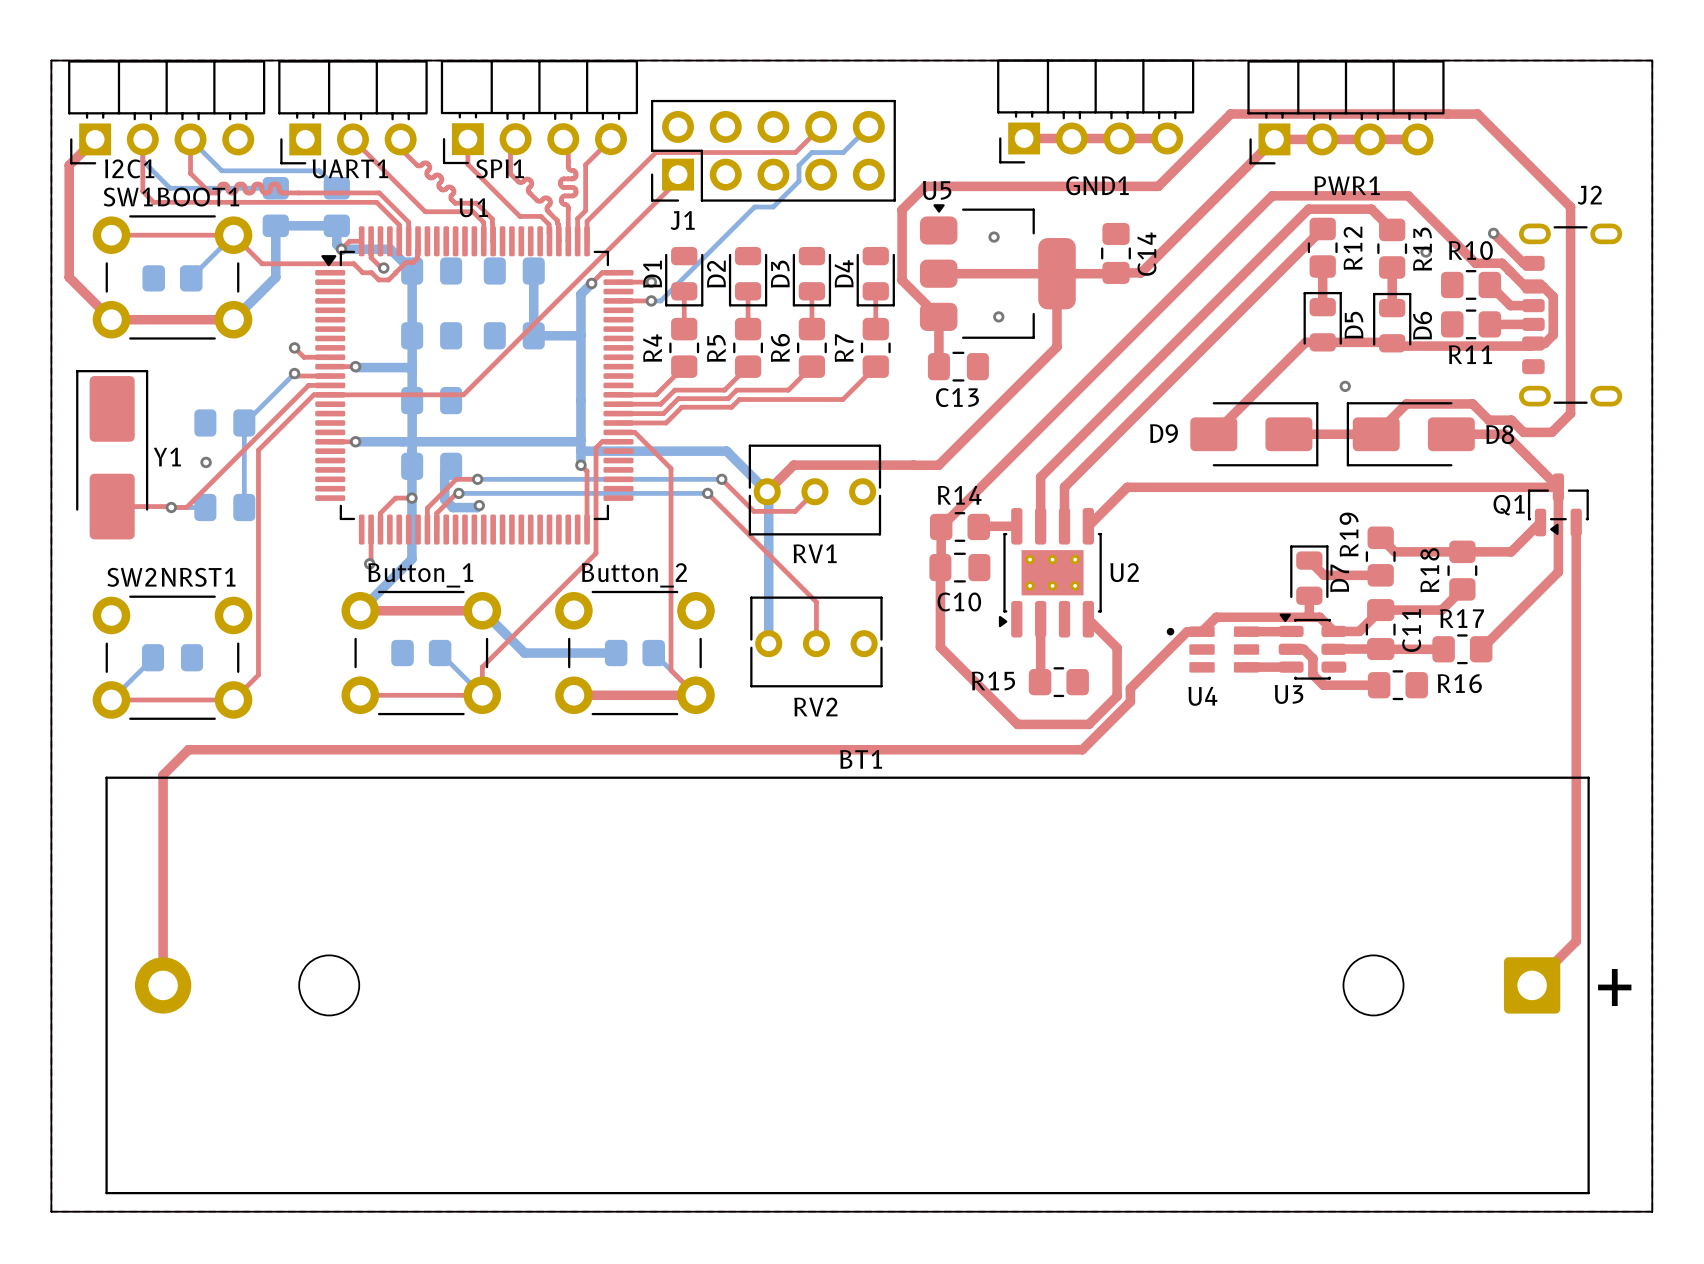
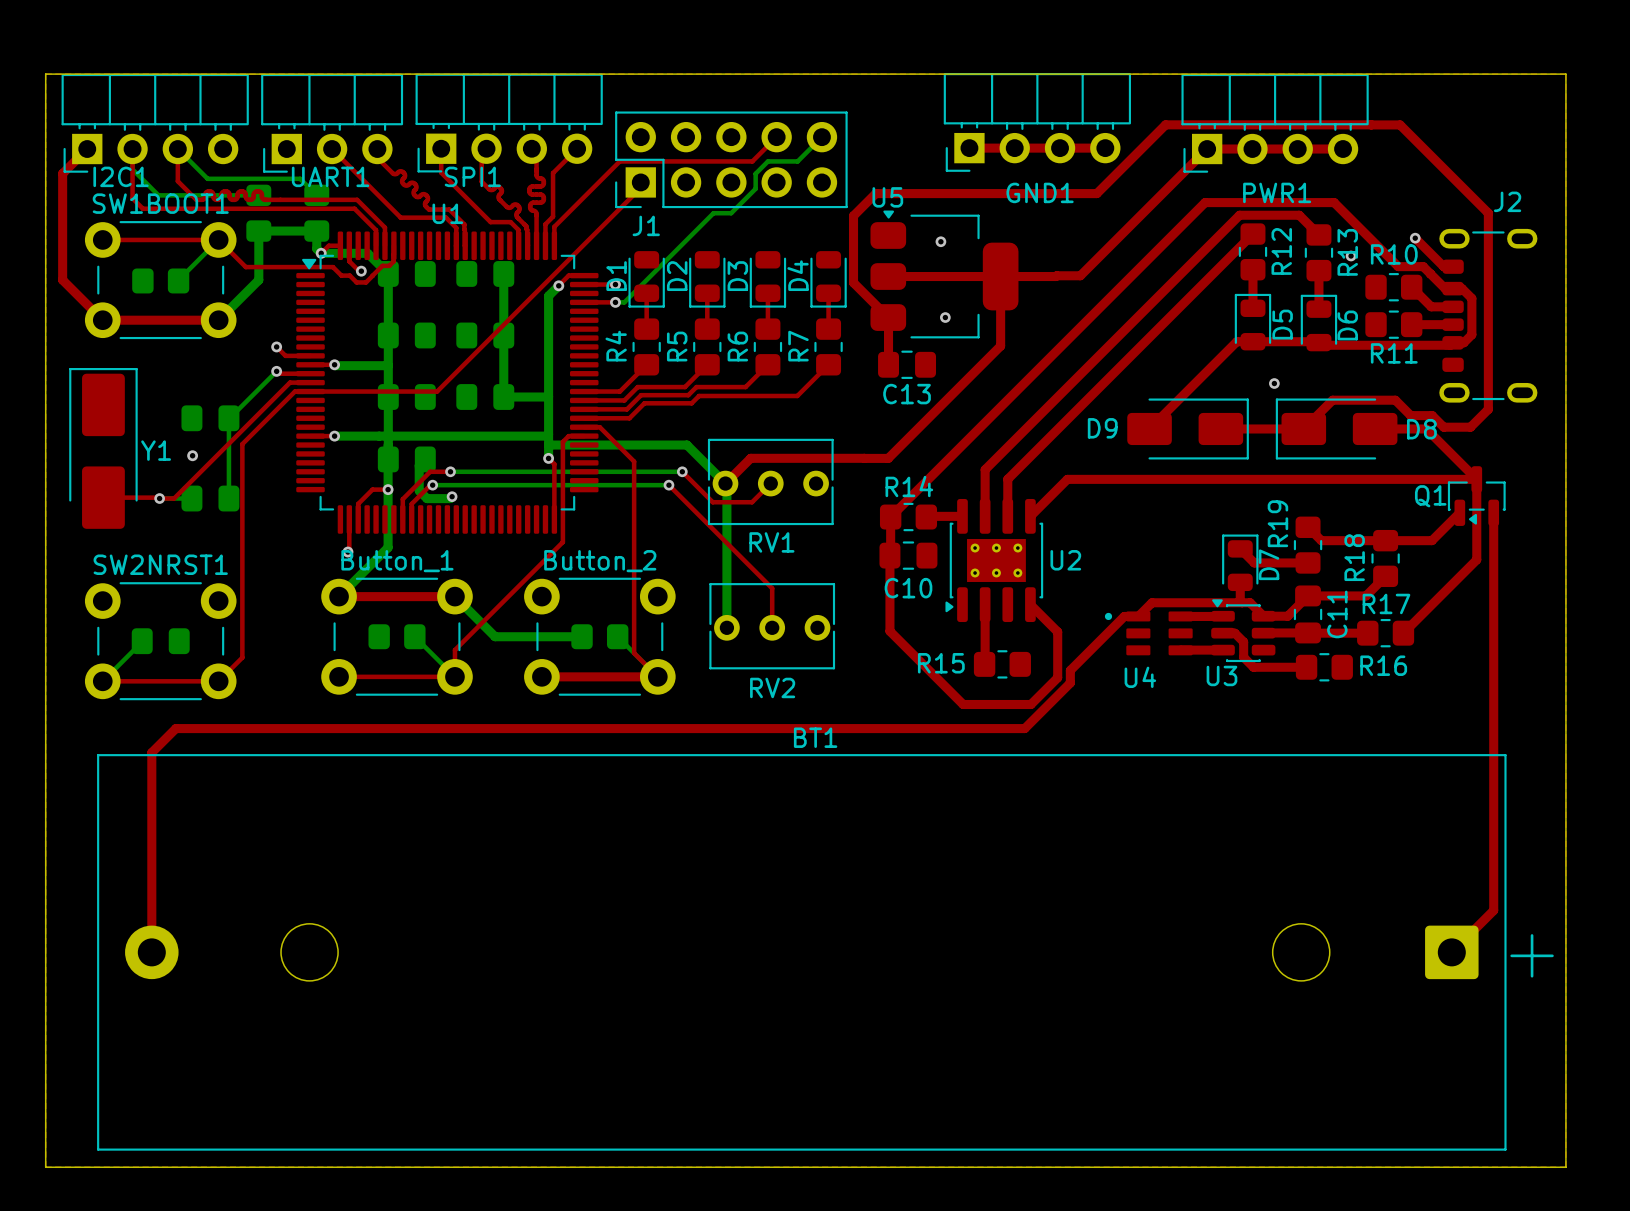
C14: (1116, 253) -> none
bottom track: (580, 335) (533, 335) -> (548, 397) (503, 397) (503, 335)
part: none -> (485, 397)

